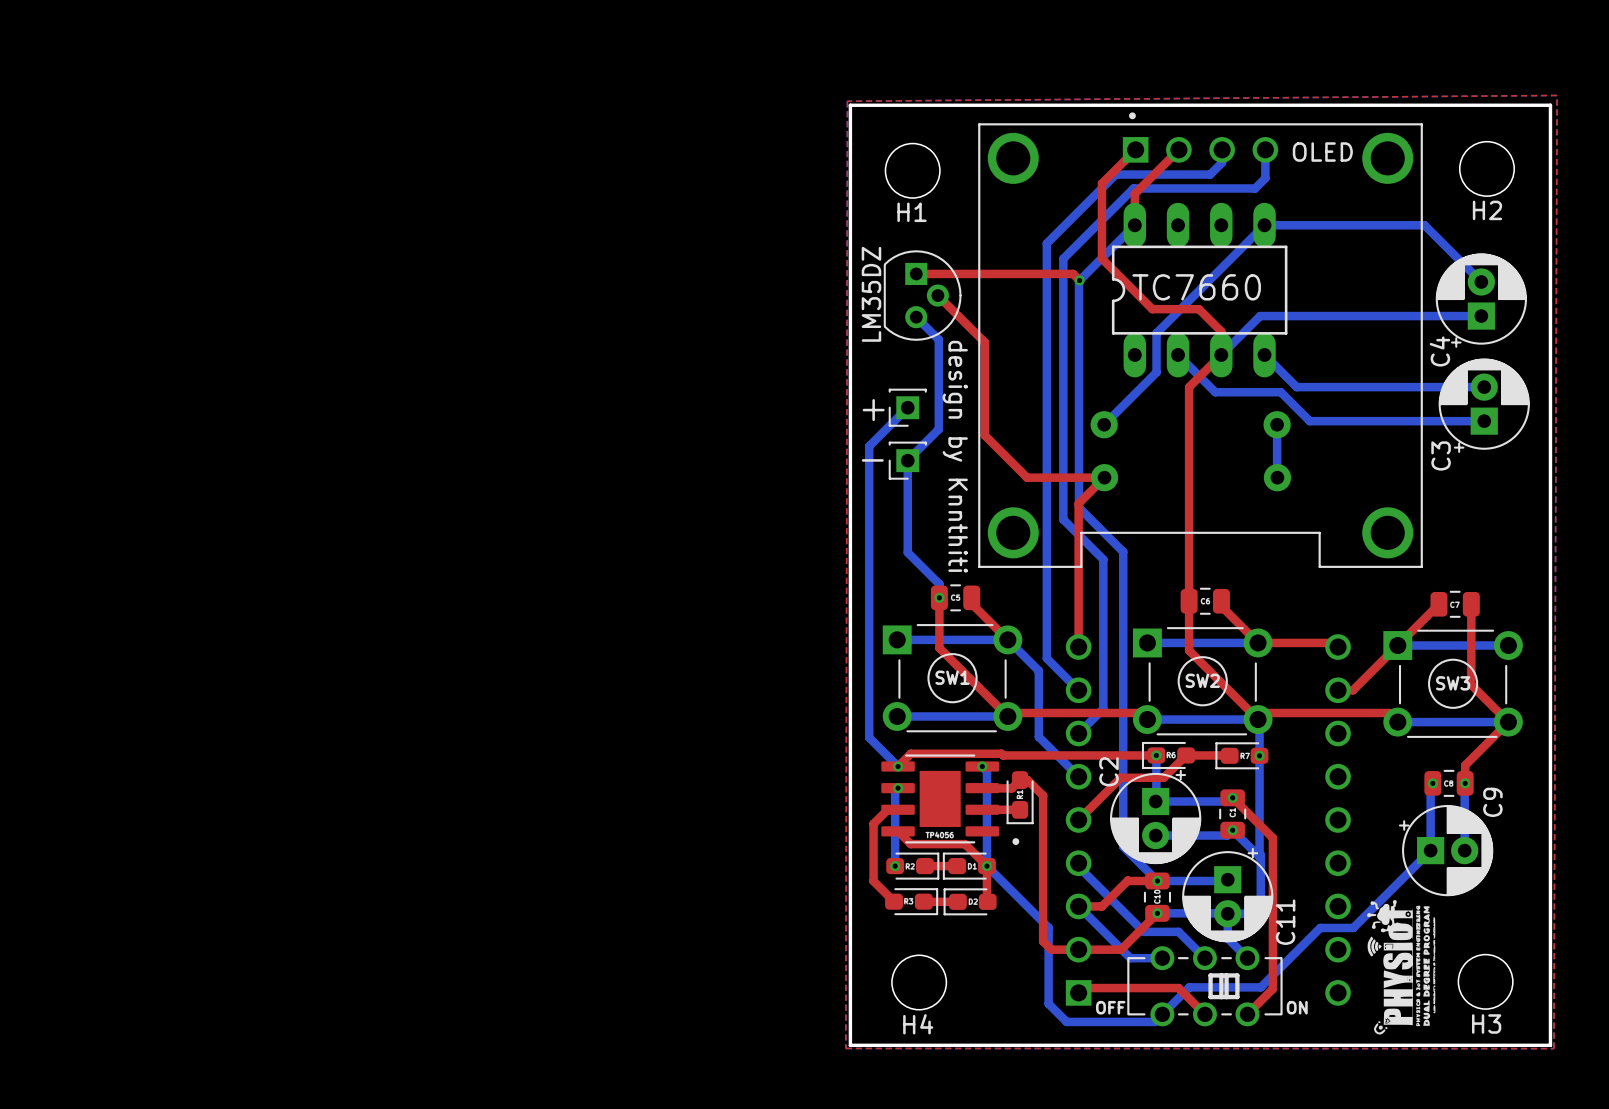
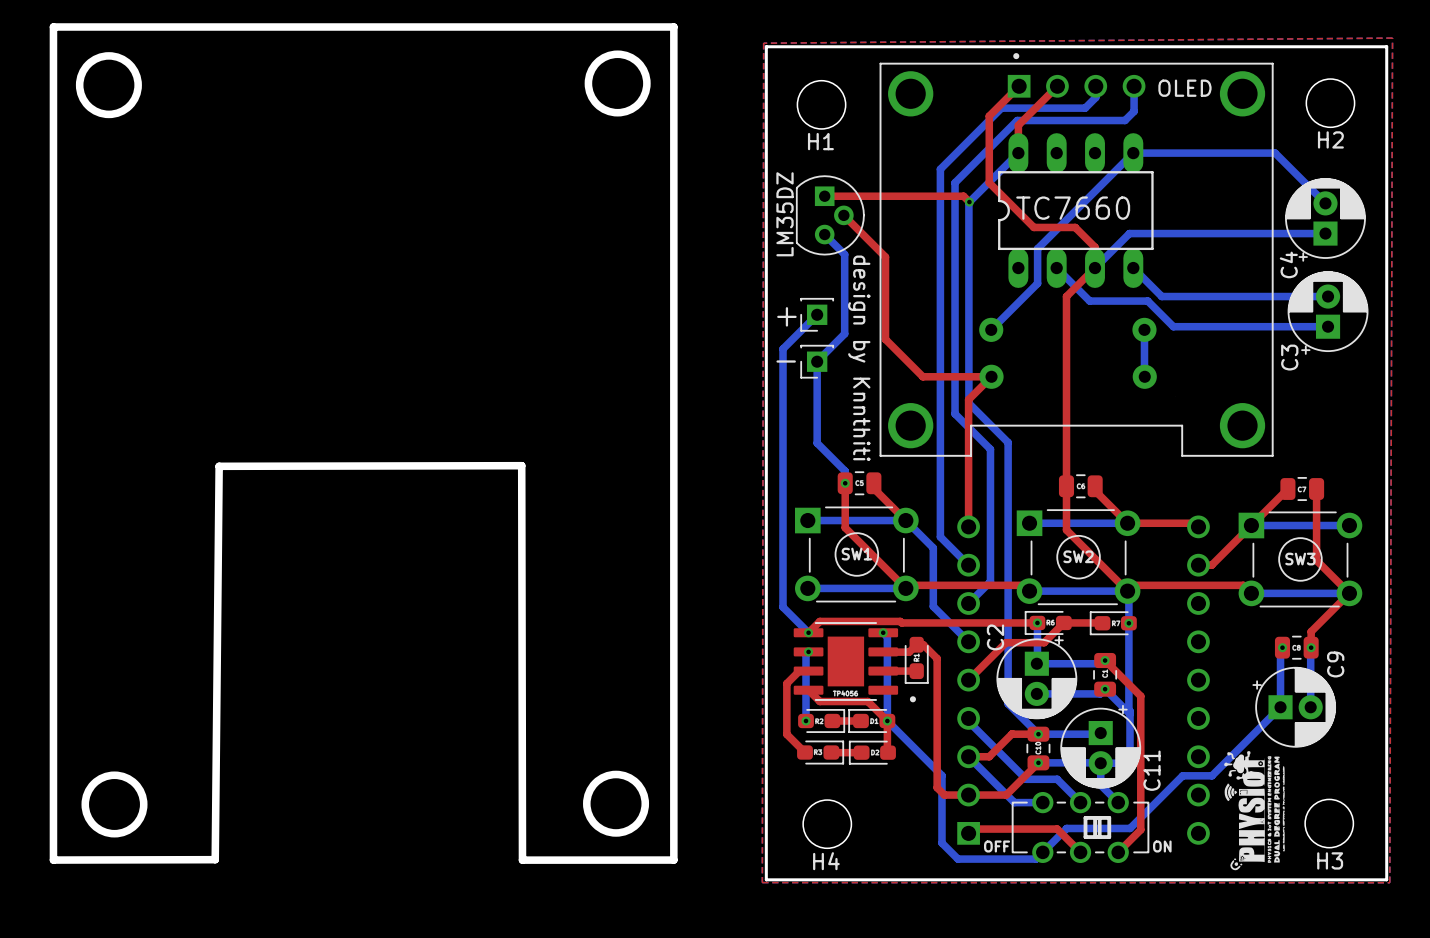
board edge: none -> (53, 26) (53, 860) (215, 859) (219, 466) (521, 465) (522, 860) (673, 860) (673, 26) (53, 26)
round board edge: none -> [584, 50, 651, 117]
round board edge: none -> [75, 52, 142, 119]
round board edge: none -> [583, 770, 650, 837]
round board edge: none -> [81, 771, 148, 838]

